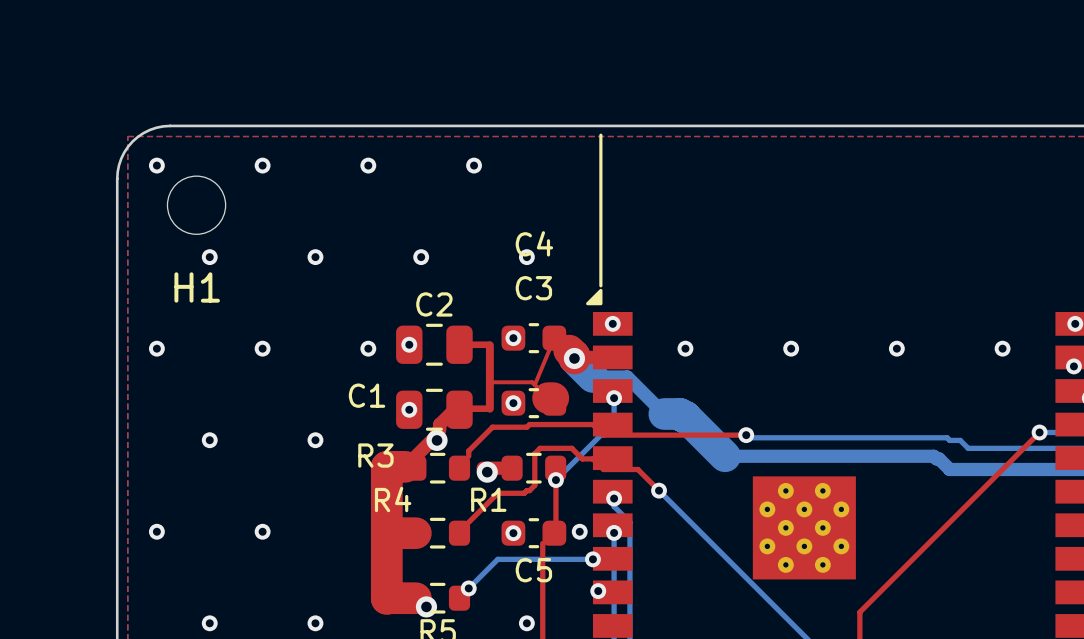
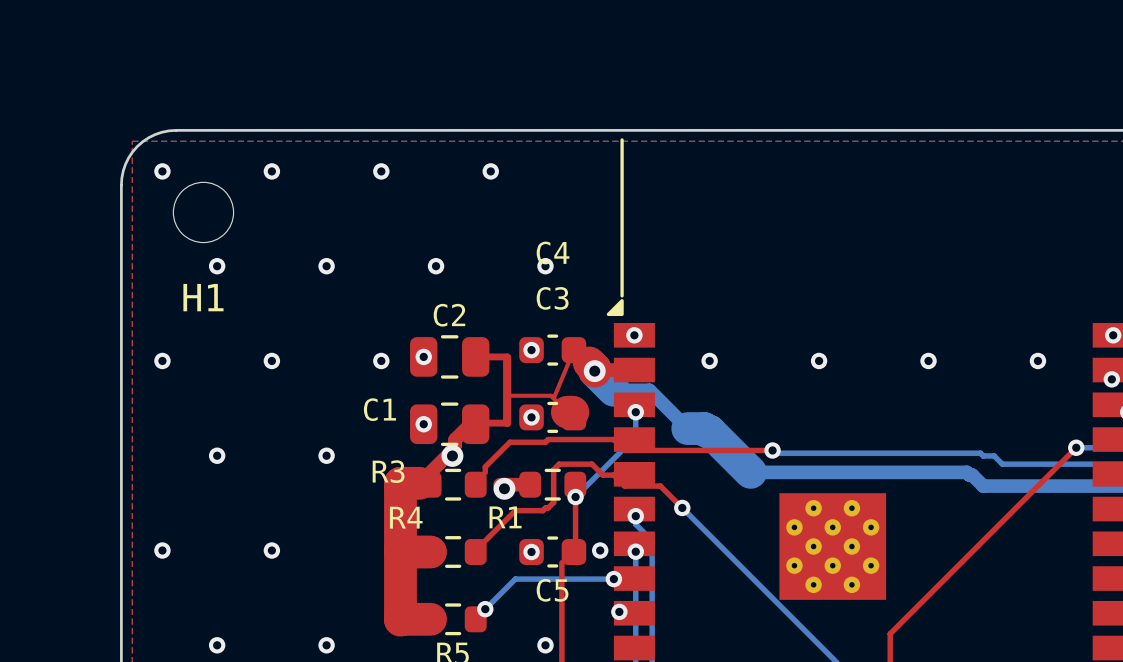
via: (426, 606) -> none

